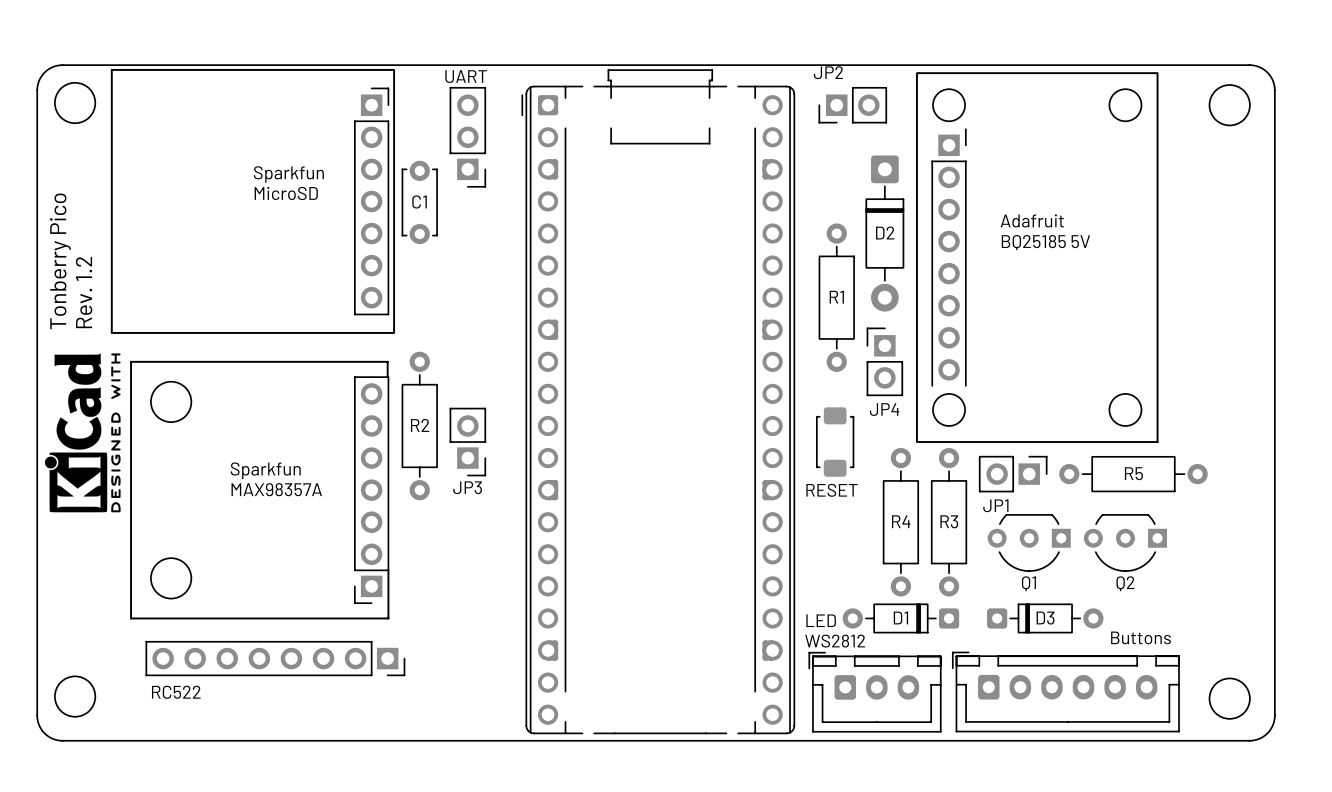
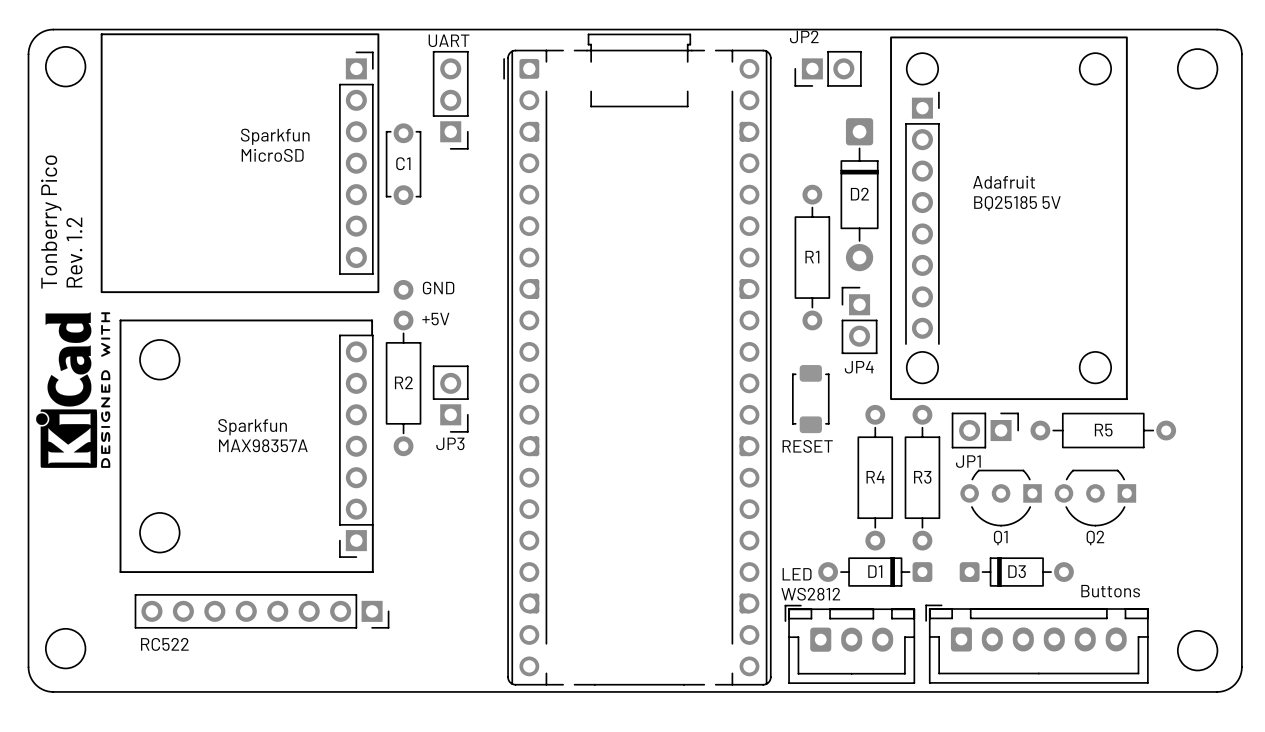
text: none -> GND (438, 288)
part: none -> (403, 289)
text: none -> +5V (435, 319)

